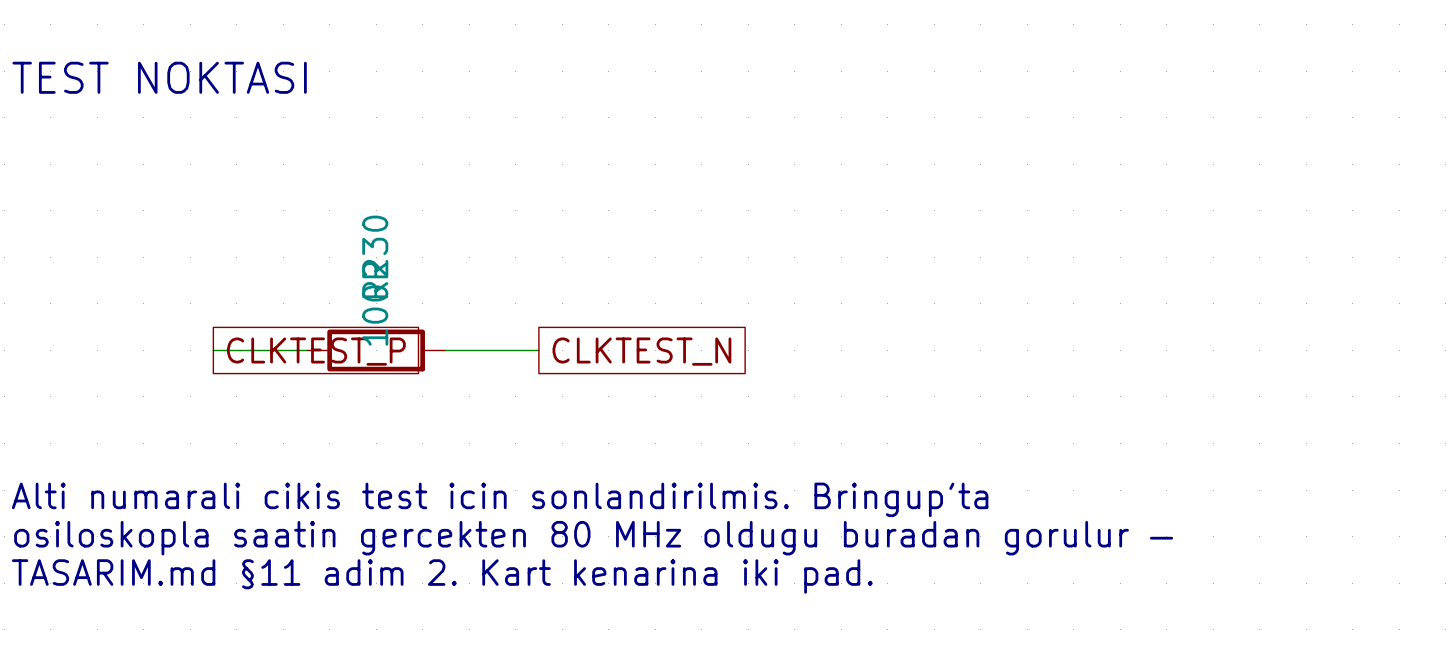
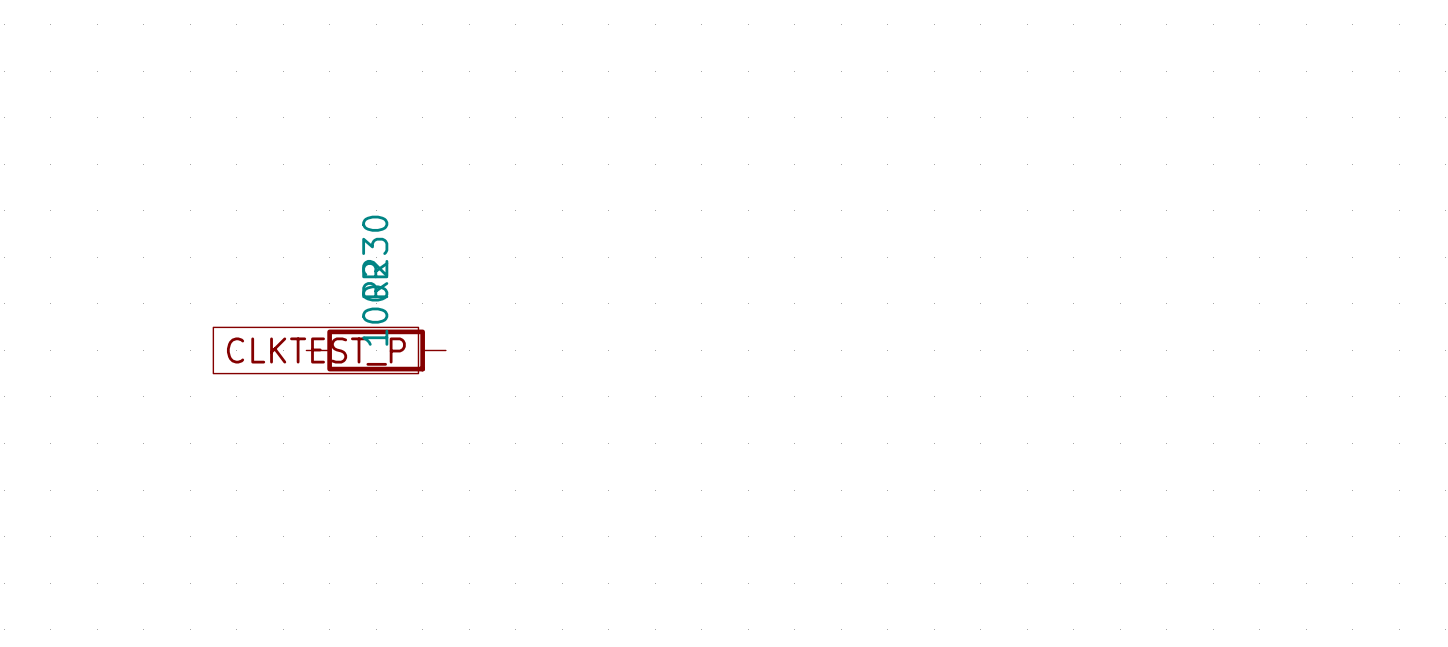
text: TEST NOKTASI (159, 77) -> none
wire: (213, 350) (306, 350) -> none
wire: (445, 350) (538, 350) -> none
global label: CLKTEST_N (641, 351) -> none
text: Alti numarali cikis test icin sonlandirilmis. Bringup'ta (500, 499) -> none
text: osiloskopla saatin gercekten 80 MHz oldugu buradan gorulur — (593, 538) -> none
text: TASARIM.md §11 adim 2. Kart kenarina iki pad. (442, 576) -> none

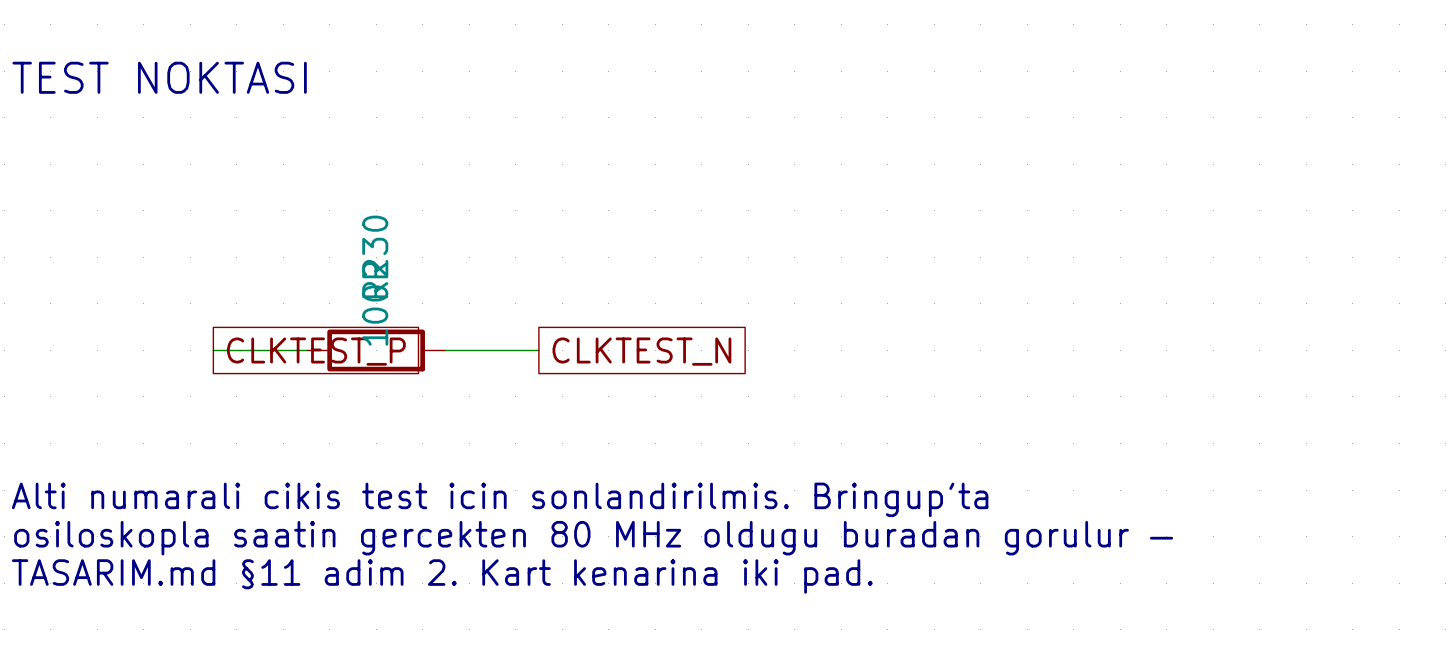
text: none -> TEST NOKTASI (159, 77)
wire: none -> (213, 350) (306, 350)
wire: none -> (445, 350) (538, 350)
global label: none -> CLKTEST_N (641, 351)
text: none -> Alti numarali cikis test icin sonlandirilmis. Bringup'ta (500, 499)
text: none -> osiloskopla saatin gercekten 80 MHz oldugu buradan gorulur — (593, 538)
text: none -> TASARIM.md §11 adim 2. Kart kenarina iki pad. (442, 576)

